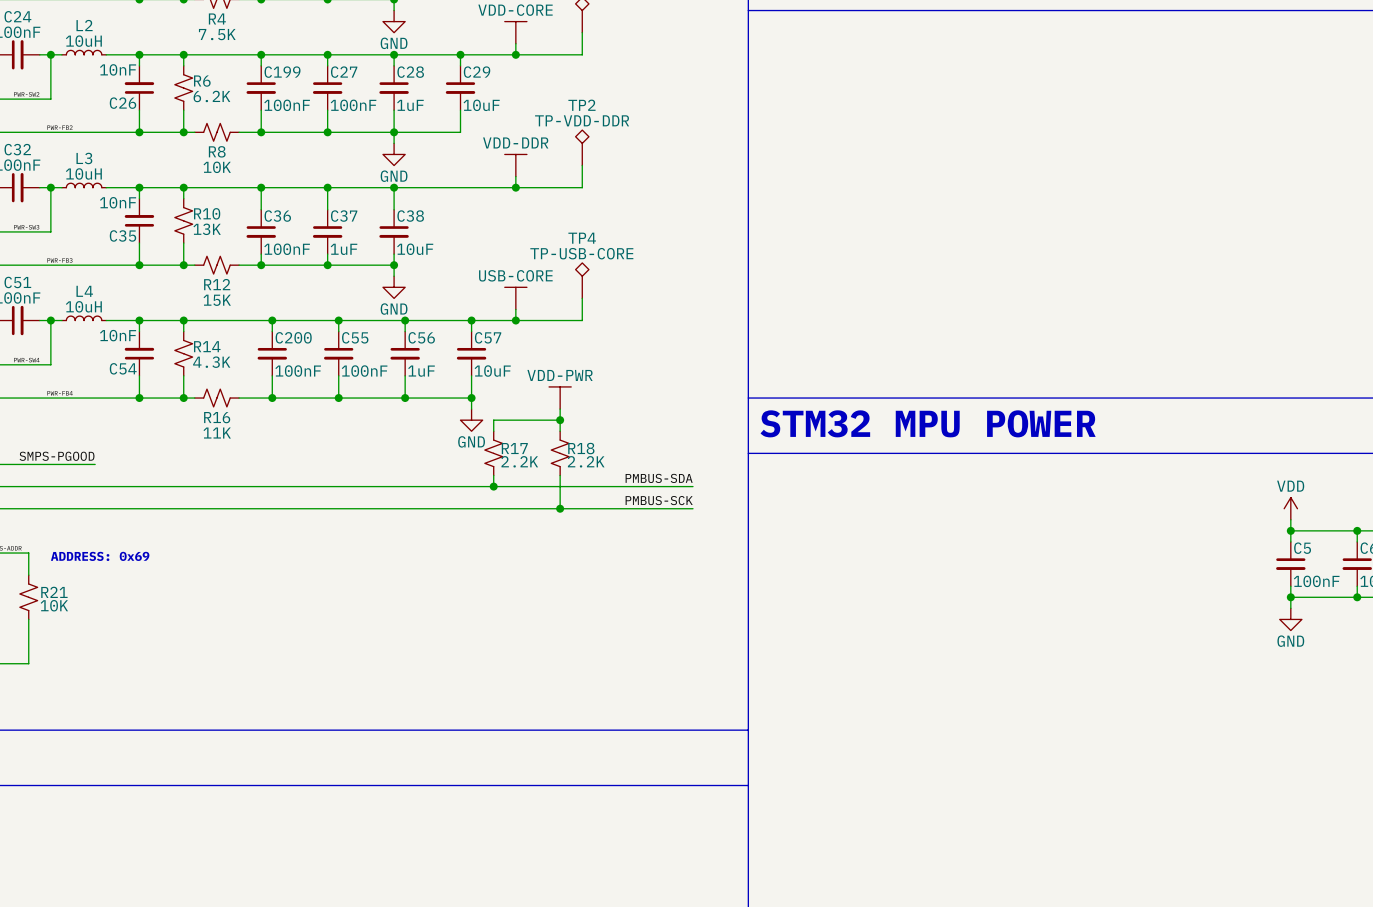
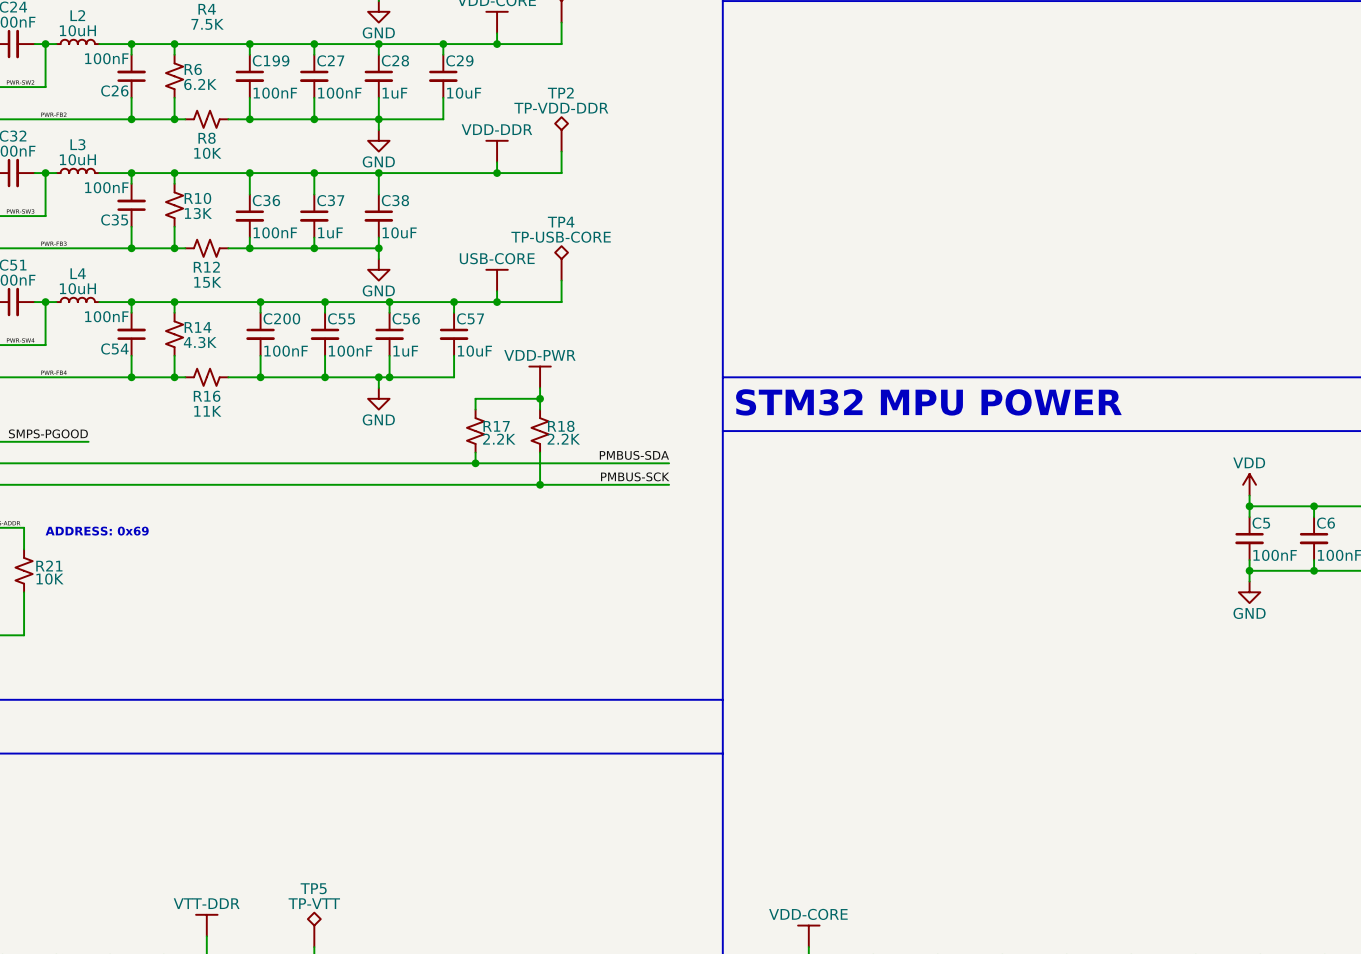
C26 value: 10nF (118, 69) -> 100nF (106, 58)
C35 value: 10nF (118, 202) -> 100nF (106, 187)
C54 value: 10nF (118, 335) -> 100nF (106, 316)
junction: none -> (378, 377)
wire: (471, 398) (471, 409) -> (378, 377) (378, 388)
junction: (471, 398) -> none
power symbol position: GND (471, 420) -> GND (378, 398)

